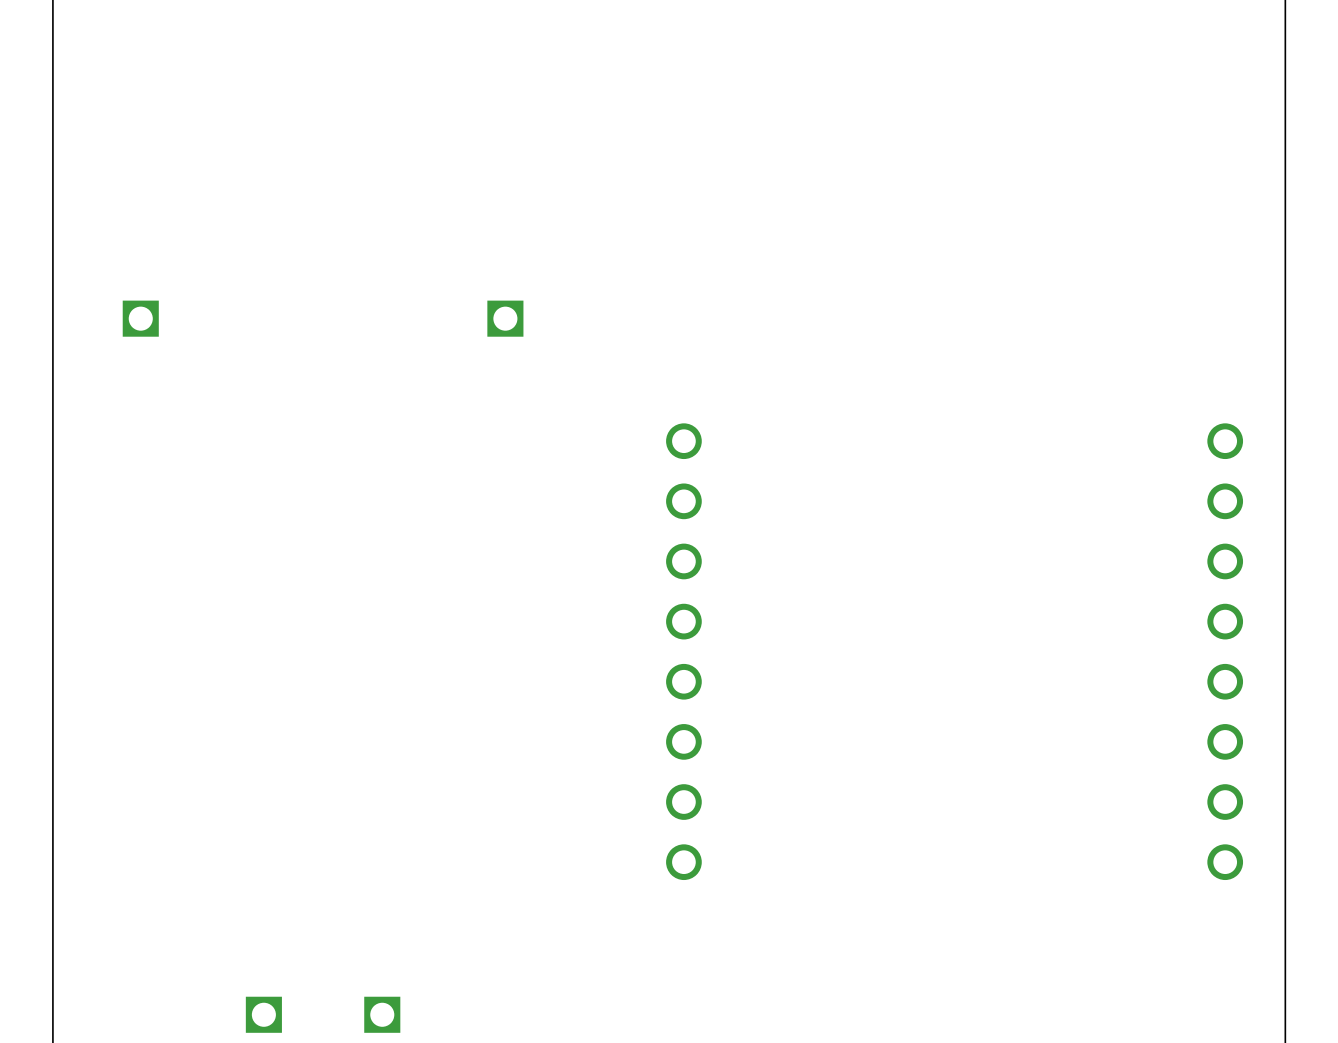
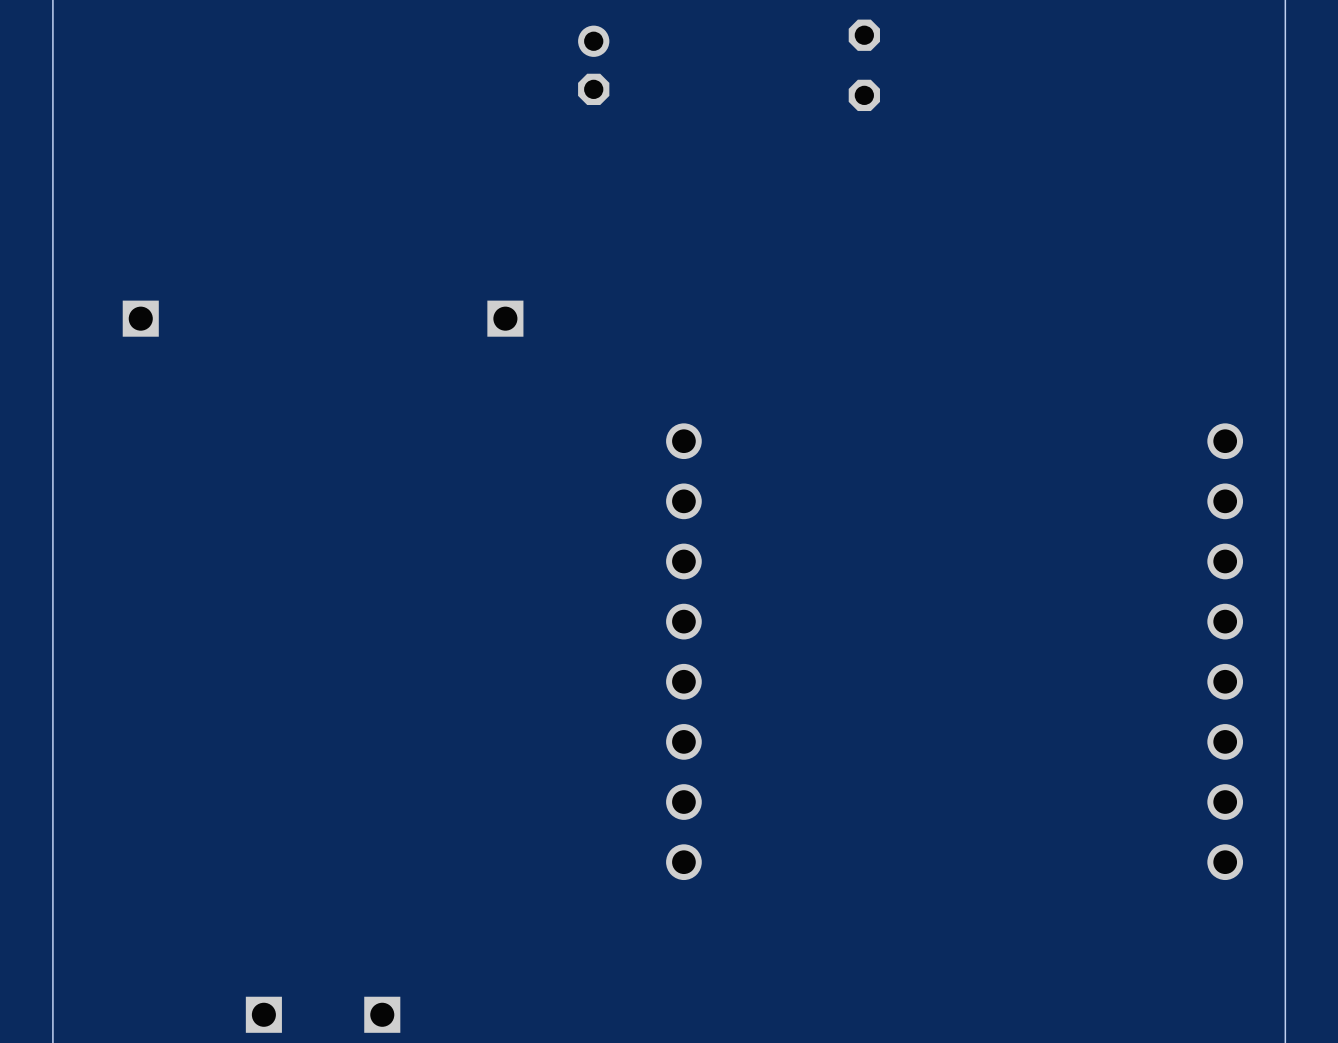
part: none -> (593, 65)
part: none -> (864, 65)

